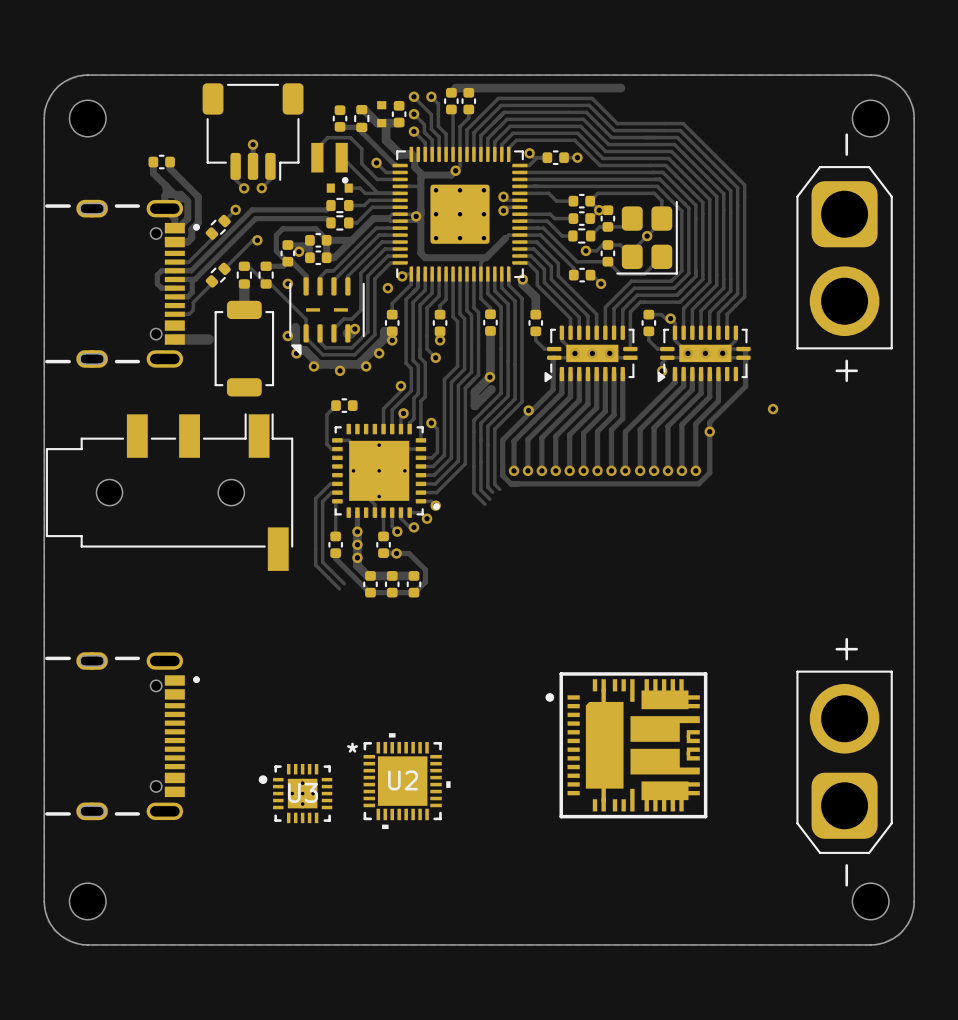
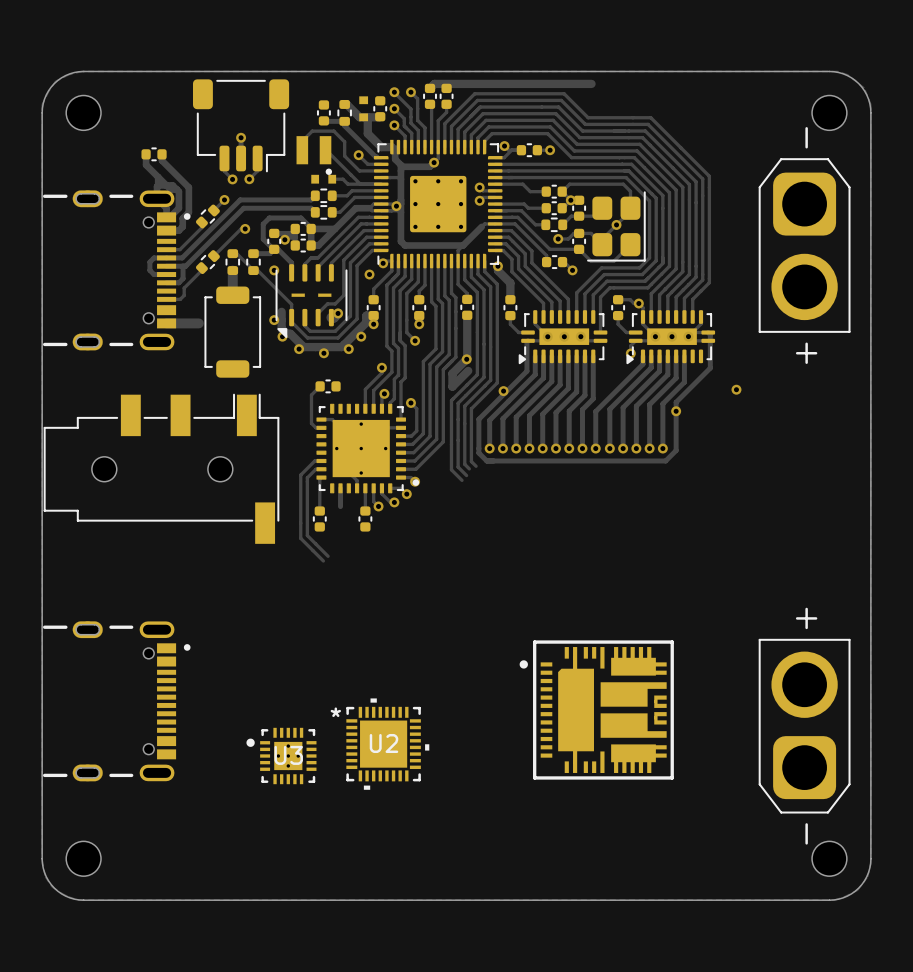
track: (357, 531) (357, 565) (367, 575) (413, 575) -> none
via: (357, 531) -> none
via: (357, 544) -> none
track: (335, 553) (335, 558) (369, 592) (414, 592) (425, 581) (425, 569) (409, 553) (383, 553) -> none
via: (396, 553) -> none
via: (357, 557) -> none
part: (370, 584) -> none
part: (392, 584) -> none
part: (413, 584) -> none

